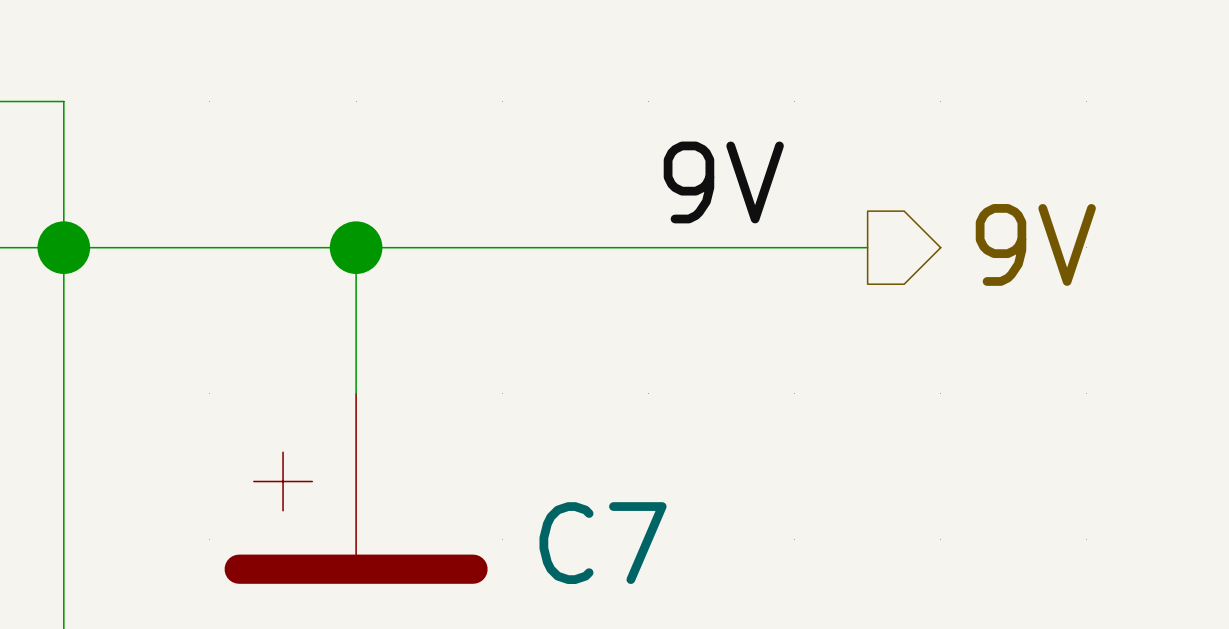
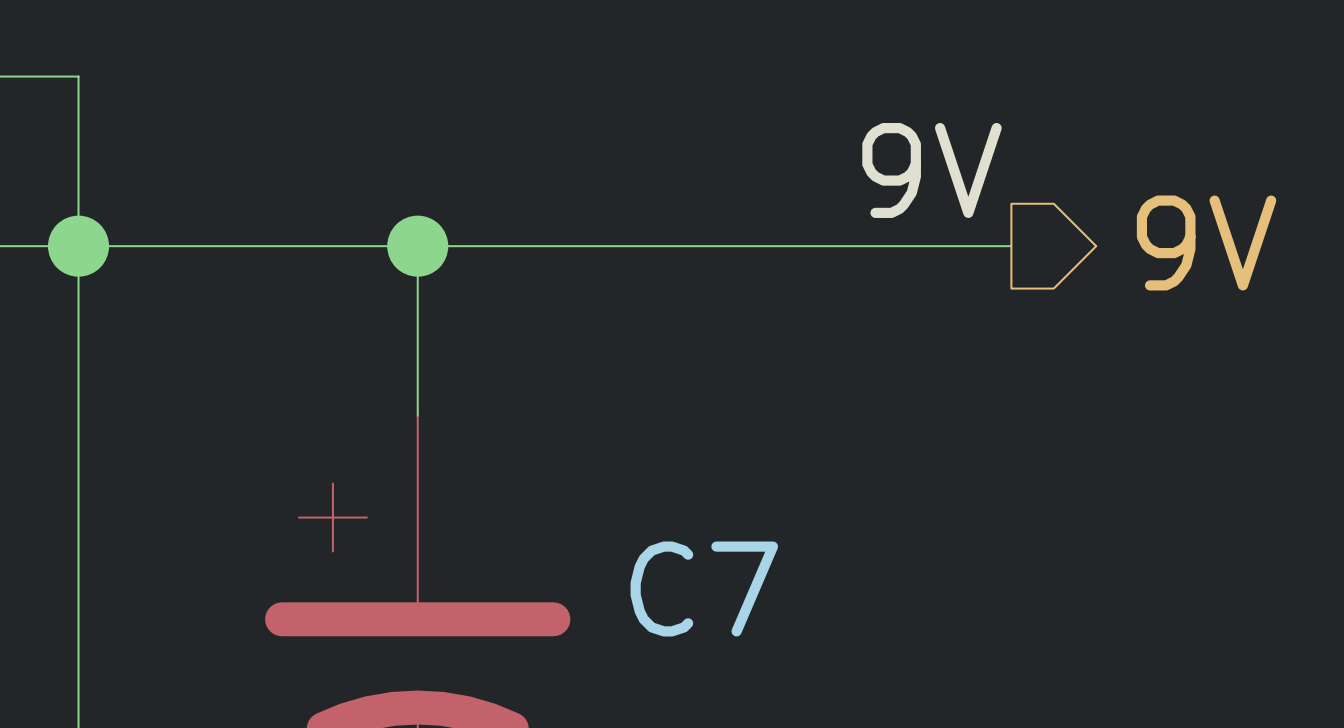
label position: 9V (723, 182) -> 9V (932, 170)

